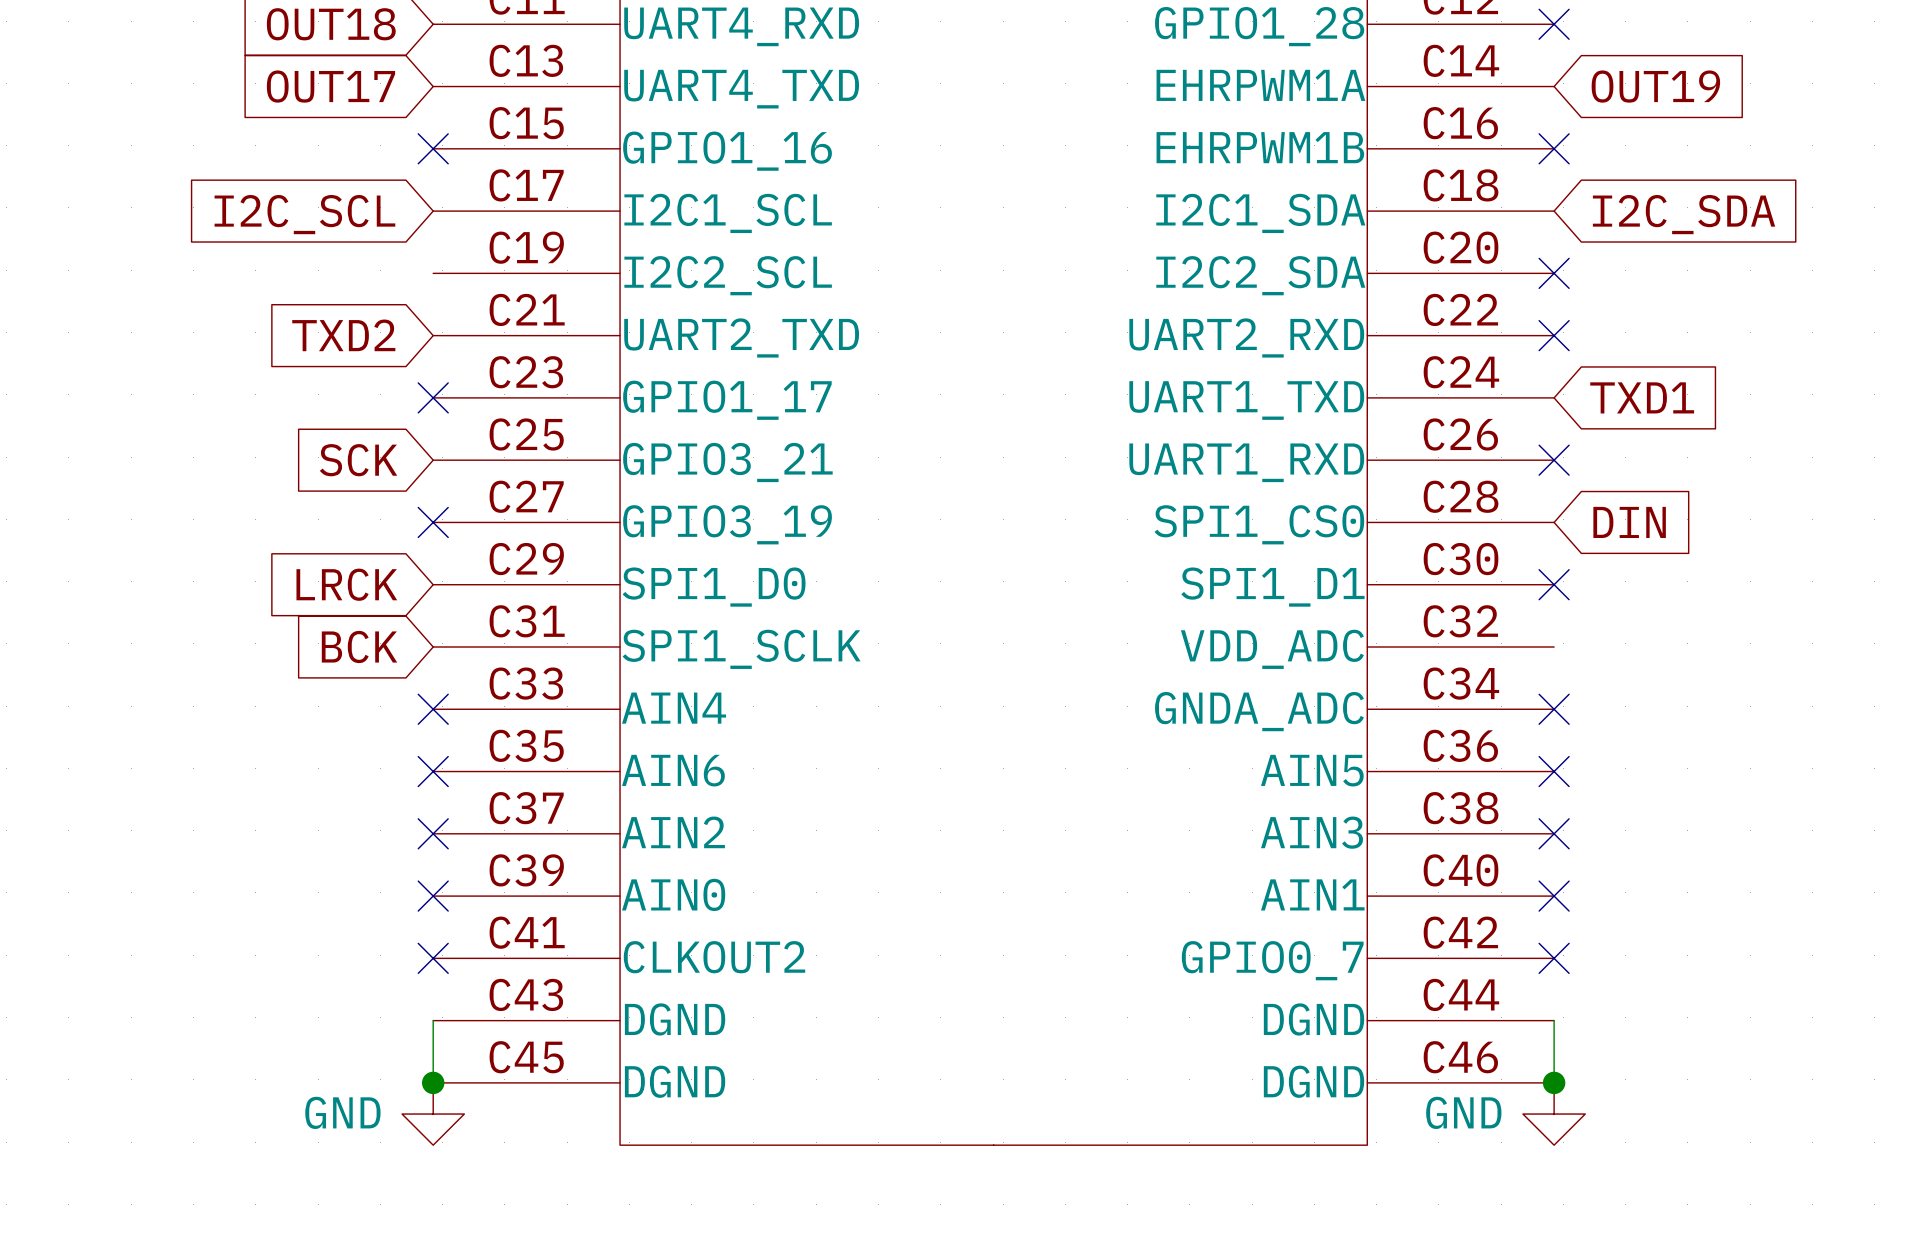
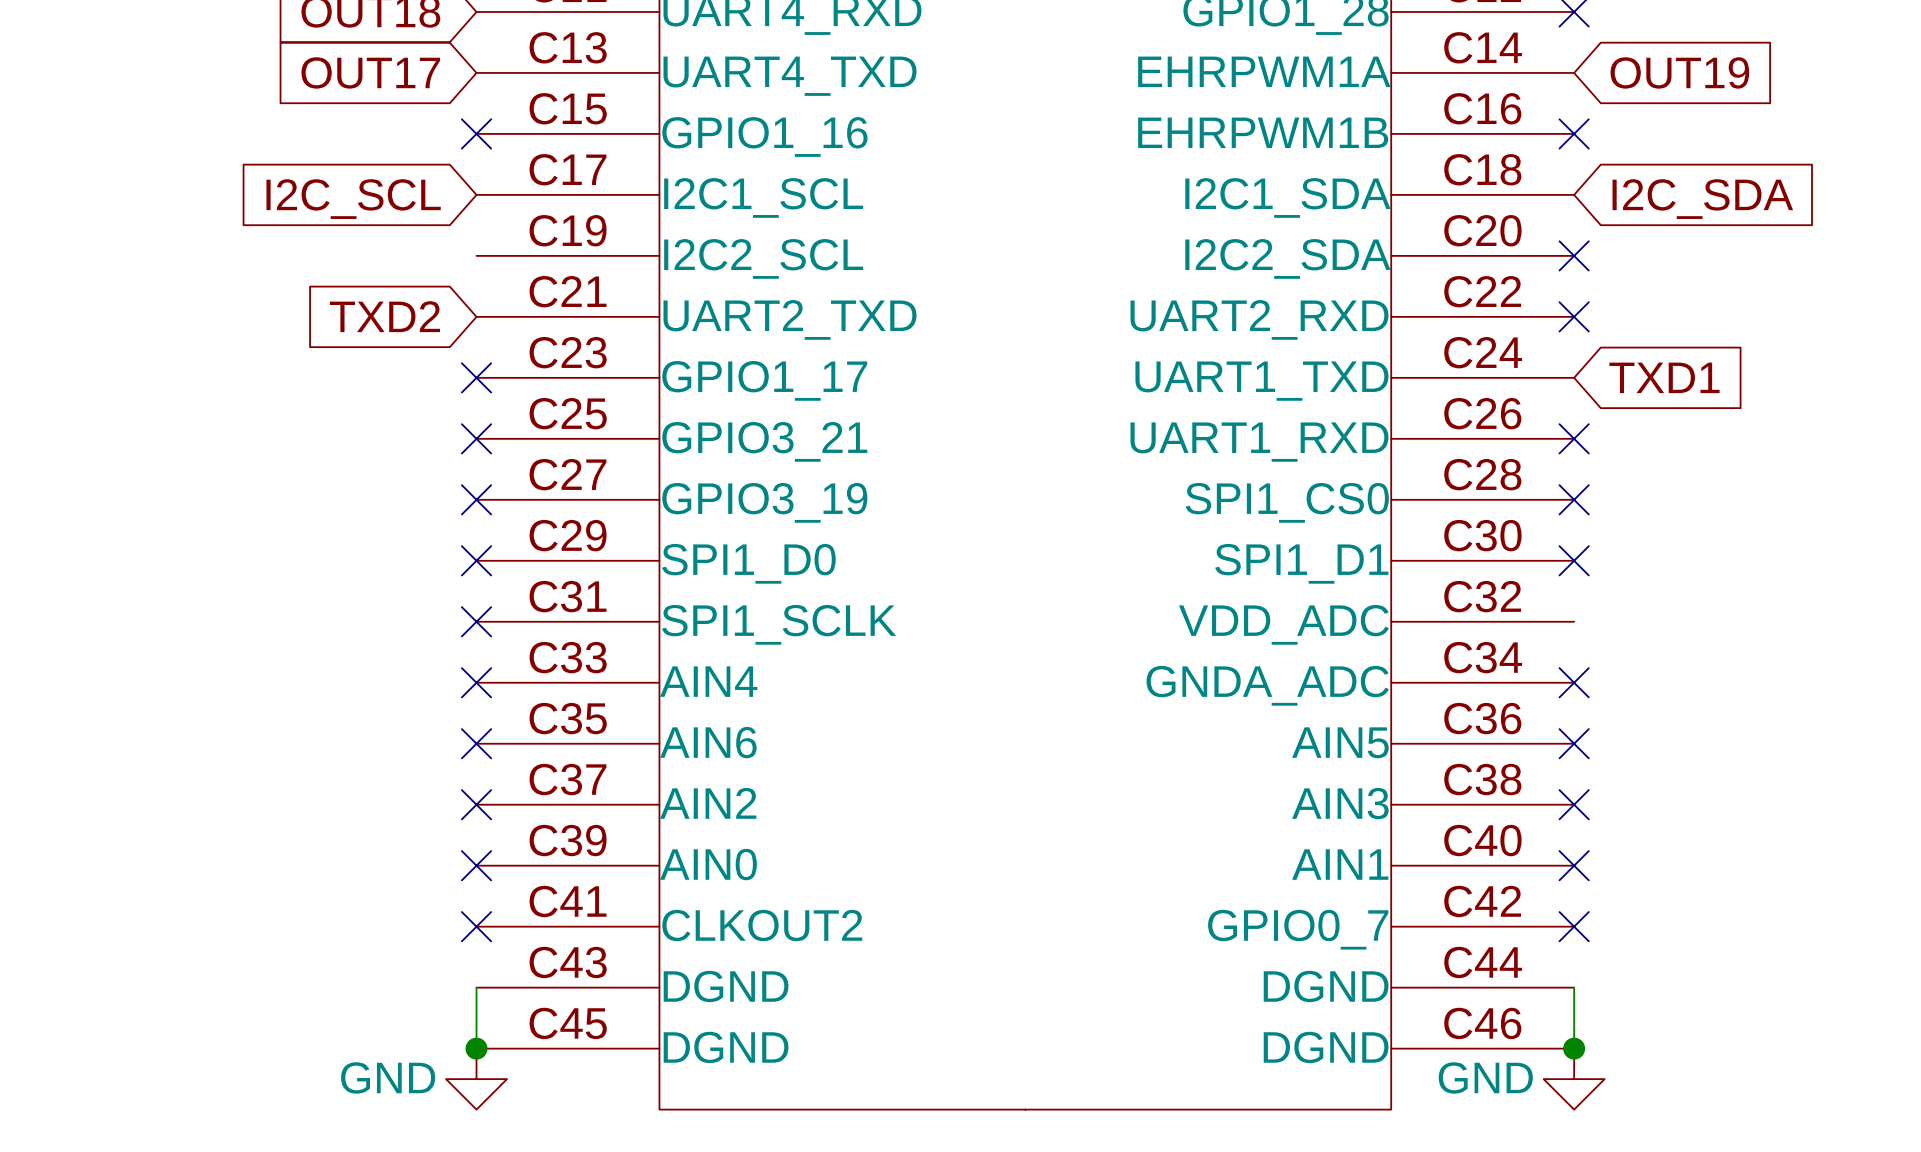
global label: SCK (358, 460) -> none
no-connect mark: none -> (476, 438)
no-connect mark: none -> (1574, 499)
global label: DIN (1629, 522) -> none
global label: LRCK (346, 584) -> none
no-connect mark: none -> (476, 560)
global label: BCK (359, 646) -> none
no-connect mark: none -> (476, 621)

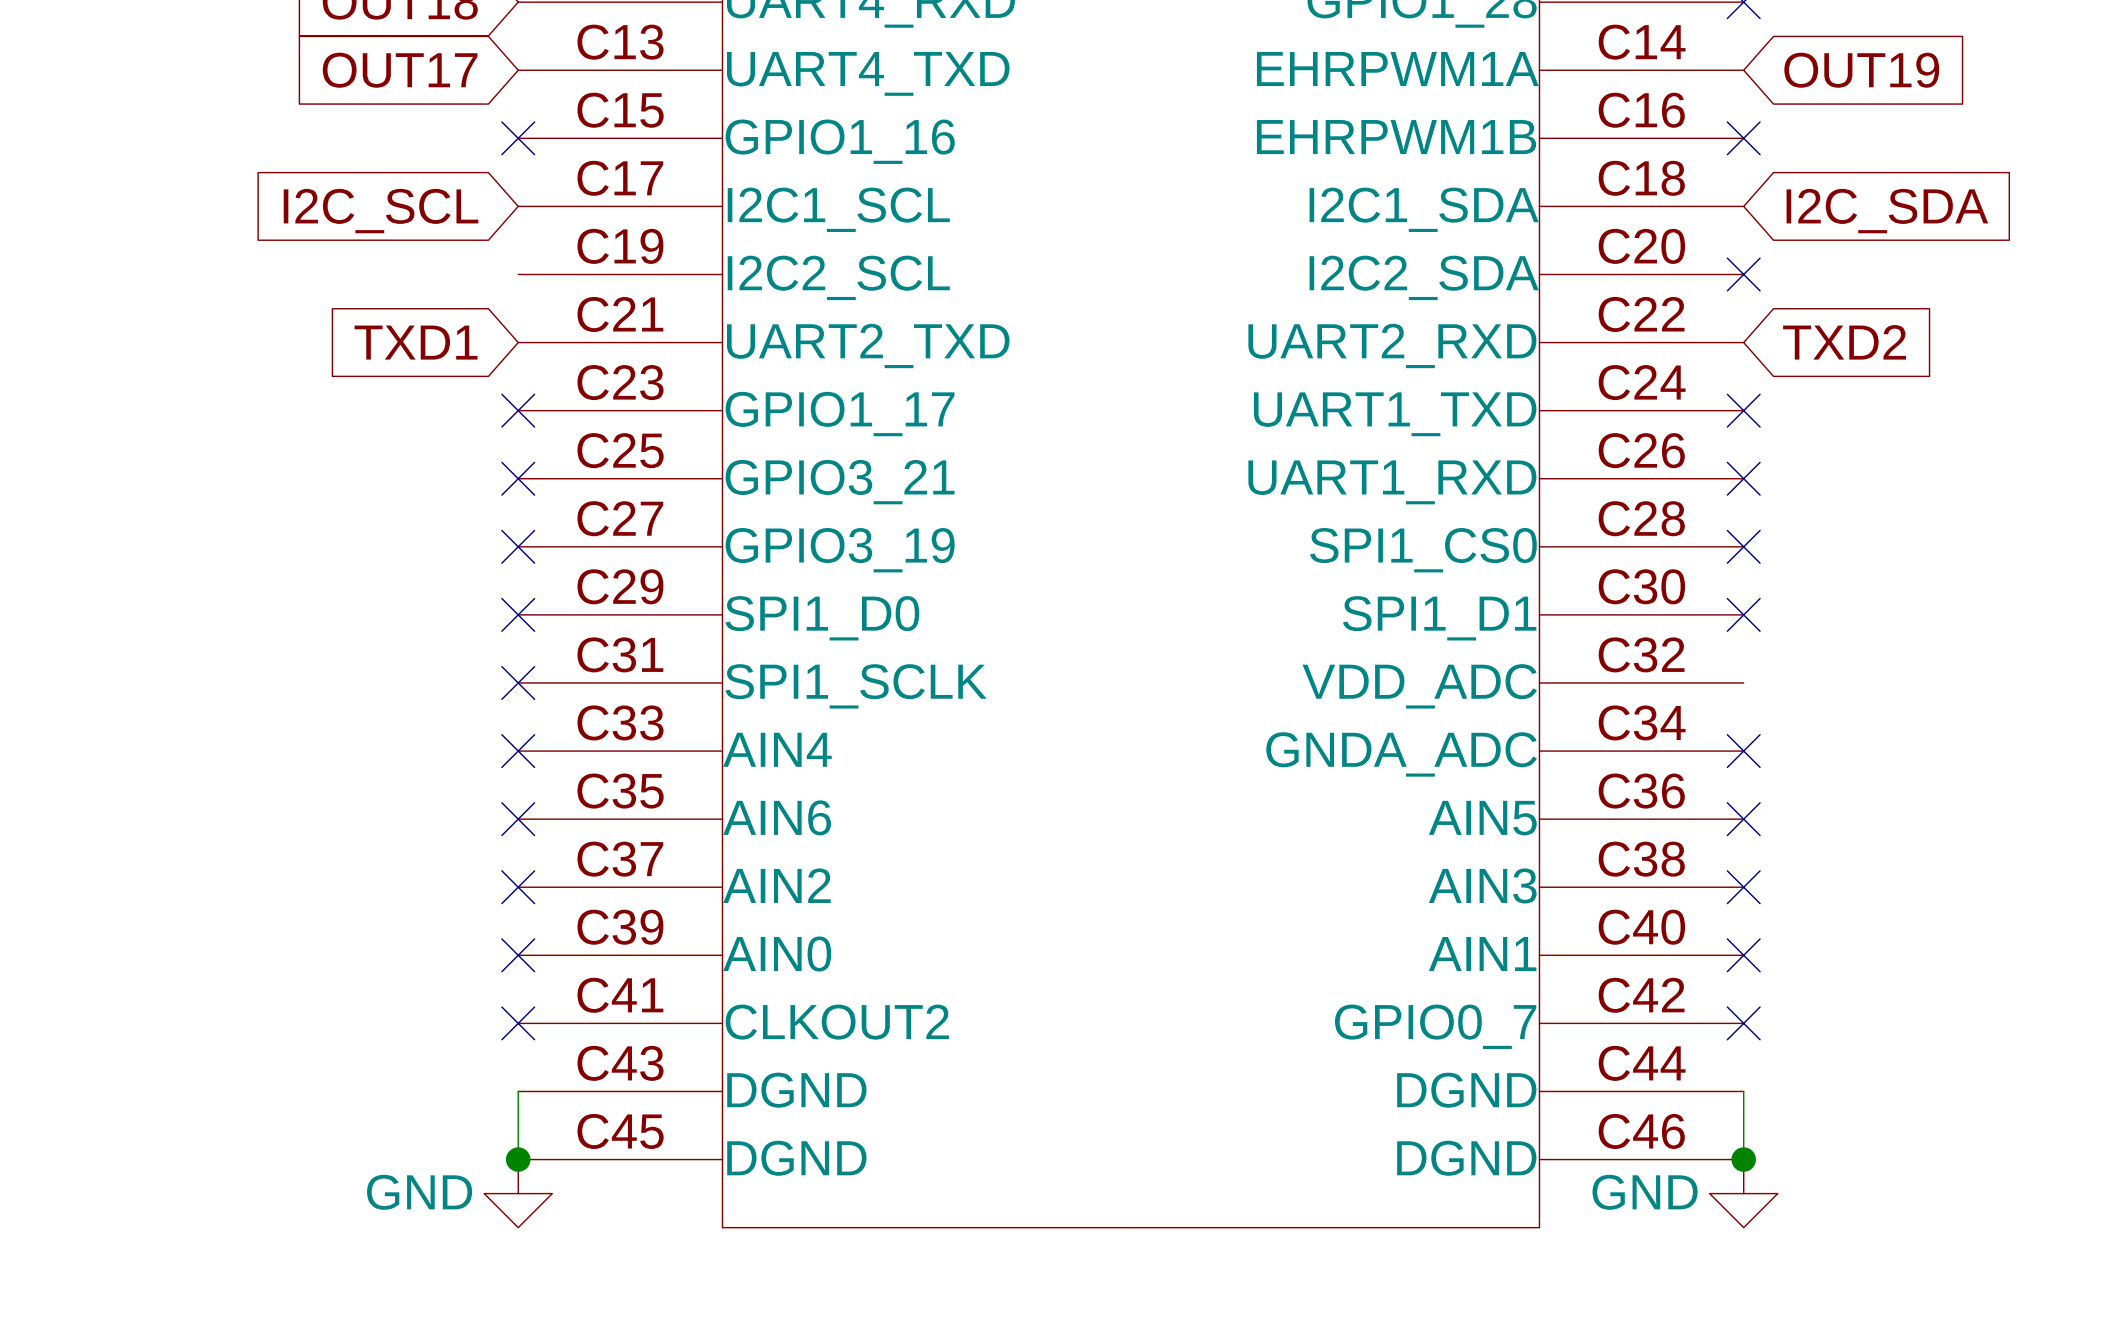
global label: TXD2 (384, 316) -> TXD1 (416, 342)
no-connect mark position: (1574, 316) -> (1743, 410)
global label: TXD1 (1664, 377) -> TXD2 (1844, 342)

